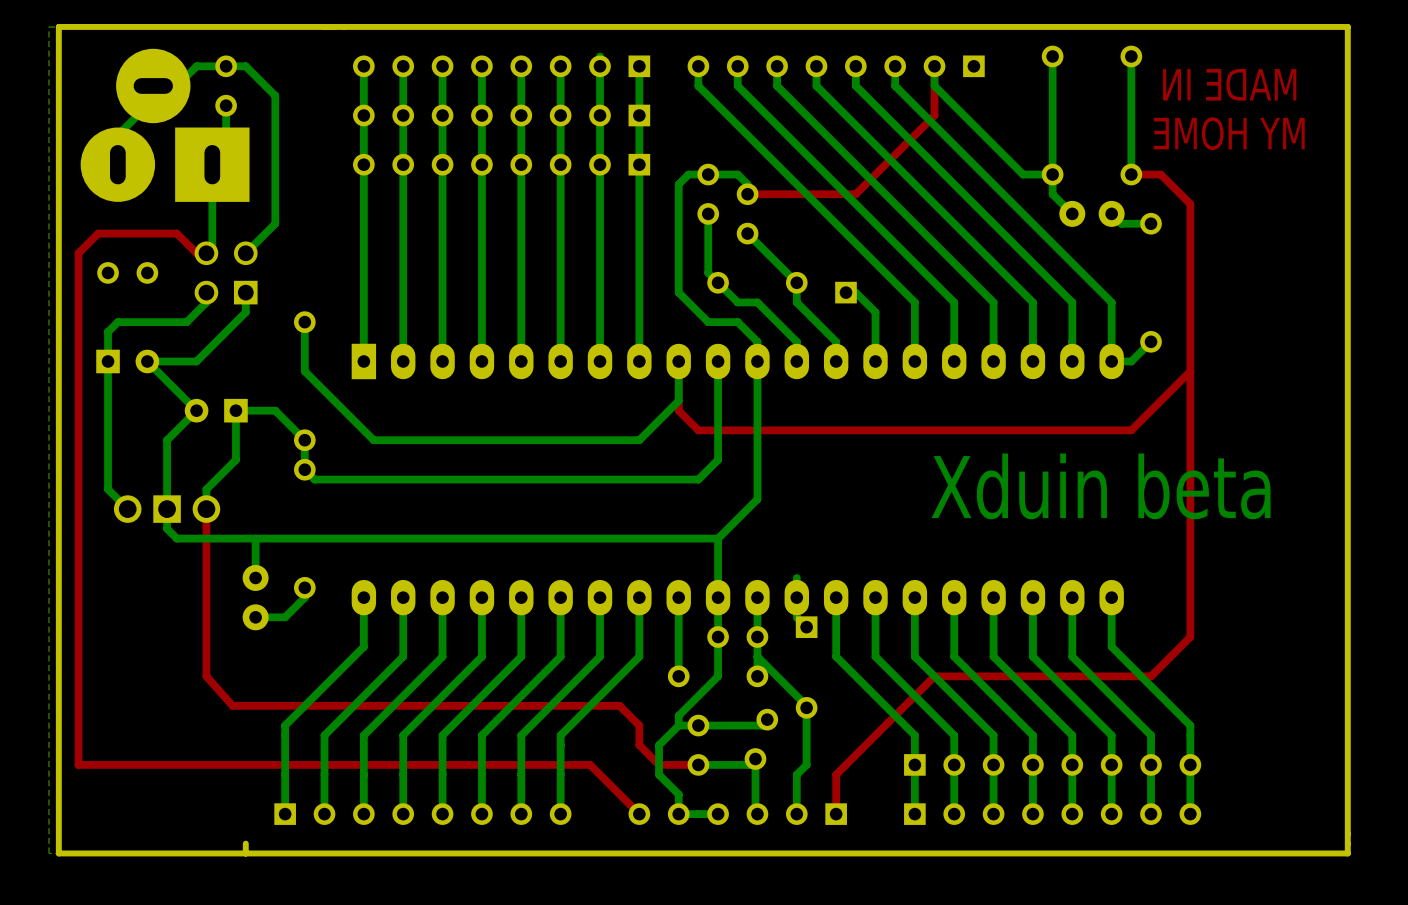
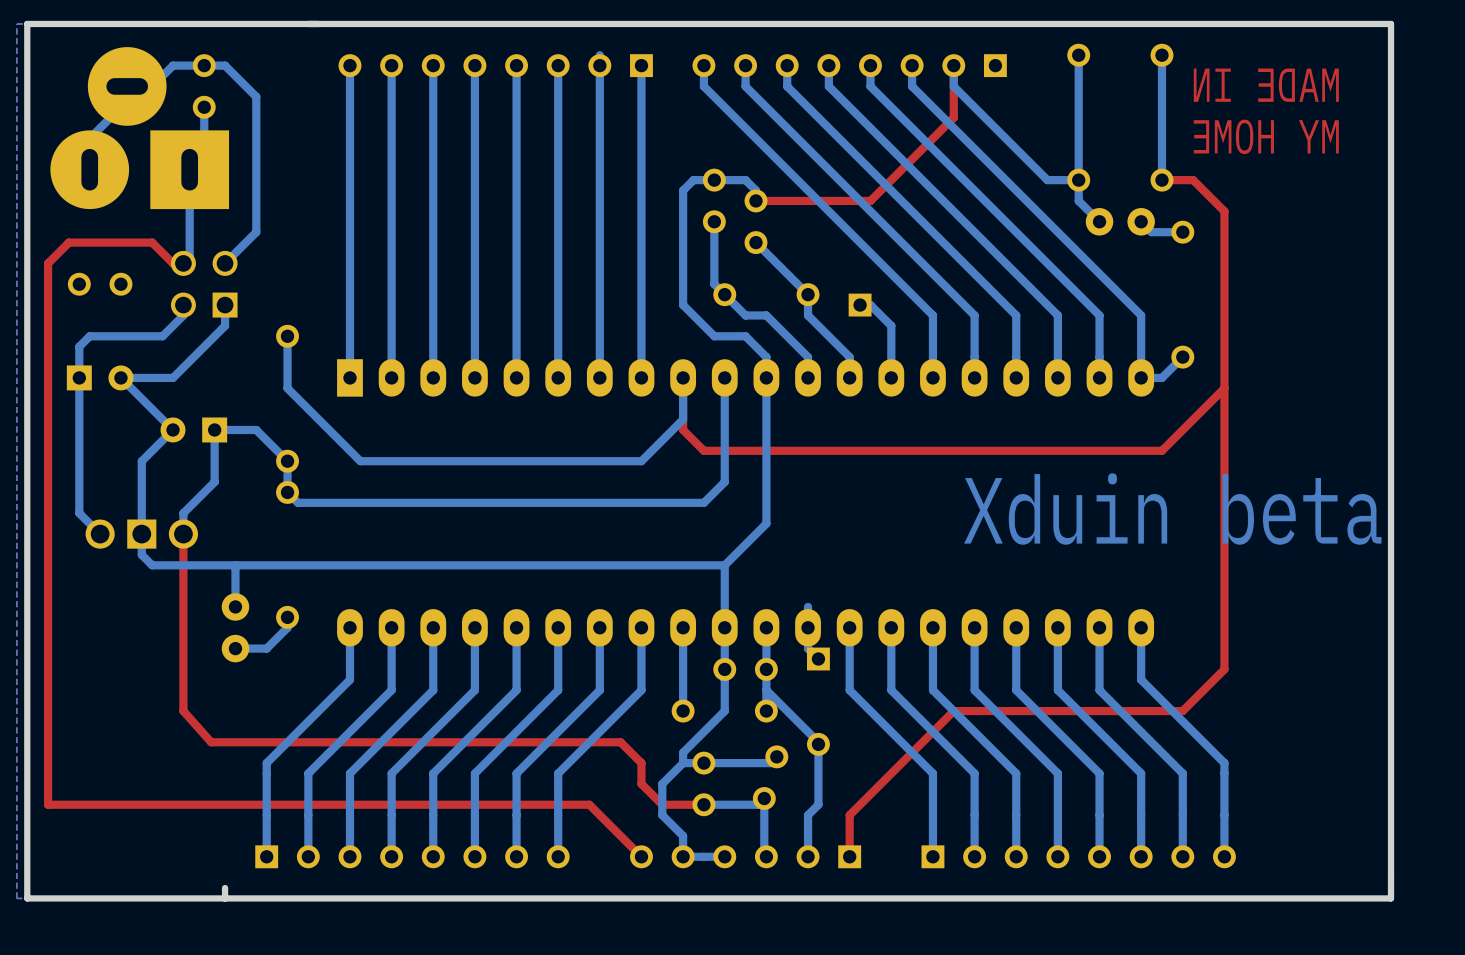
part: (501, 115) -> none
part: (501, 164) -> none
part: (1052, 764) -> none

